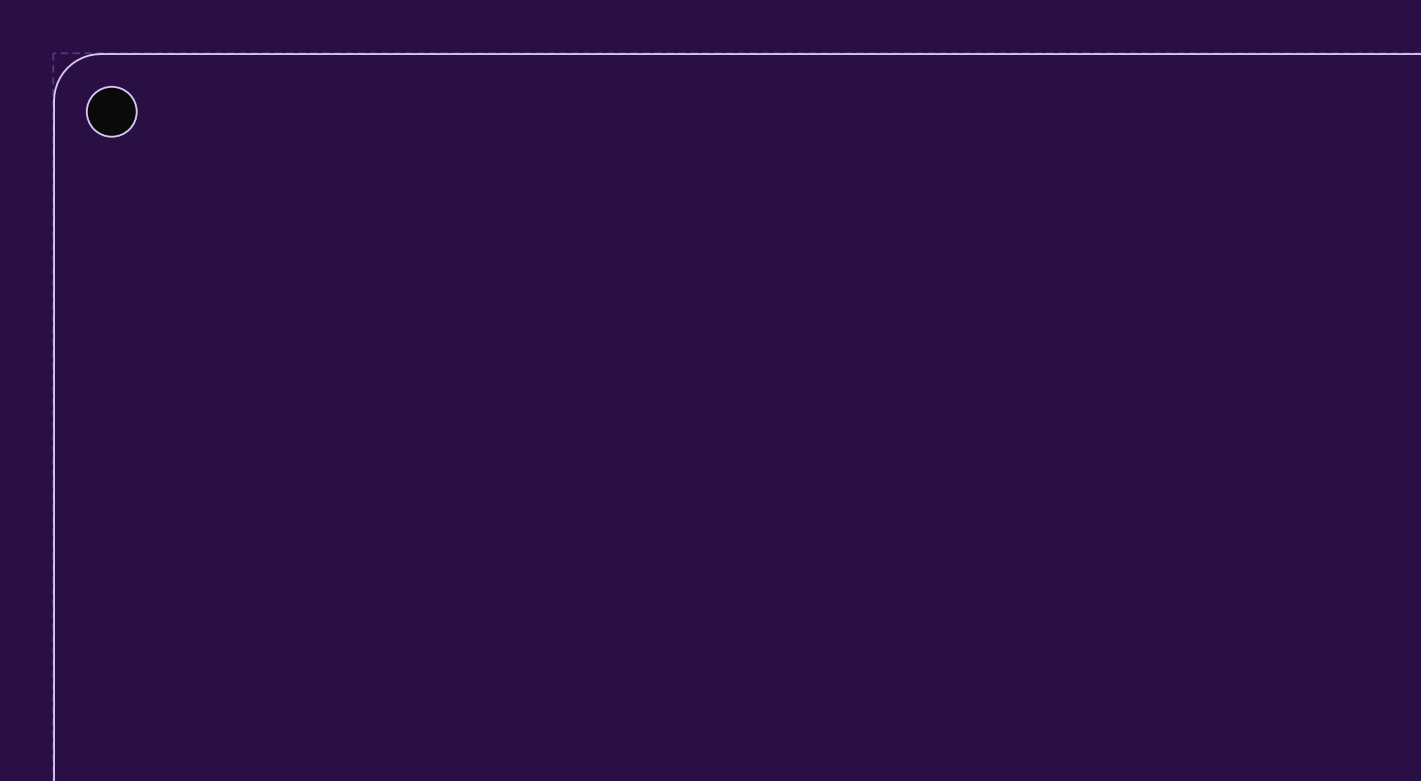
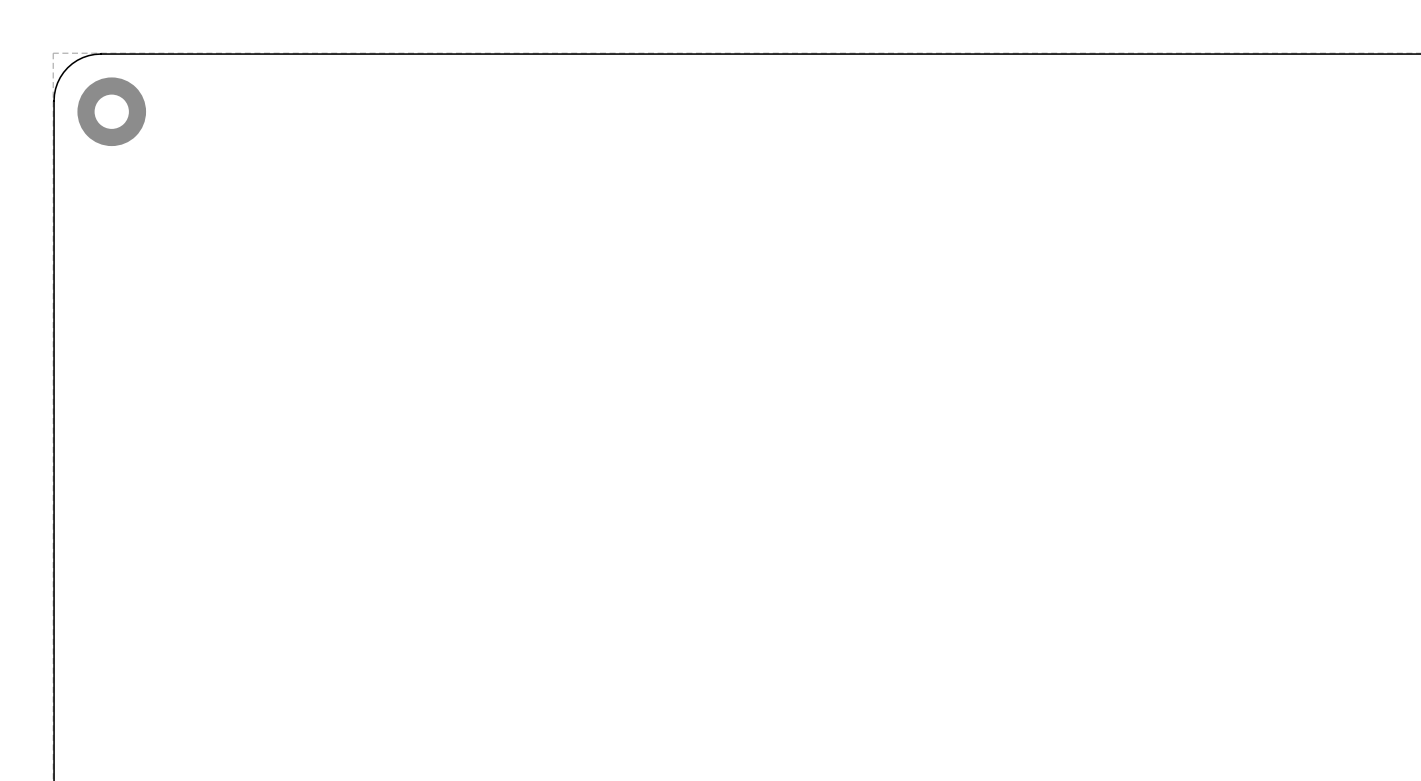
part footprint: [86, 86, 137, 137] -> [77, 77, 147, 147]

